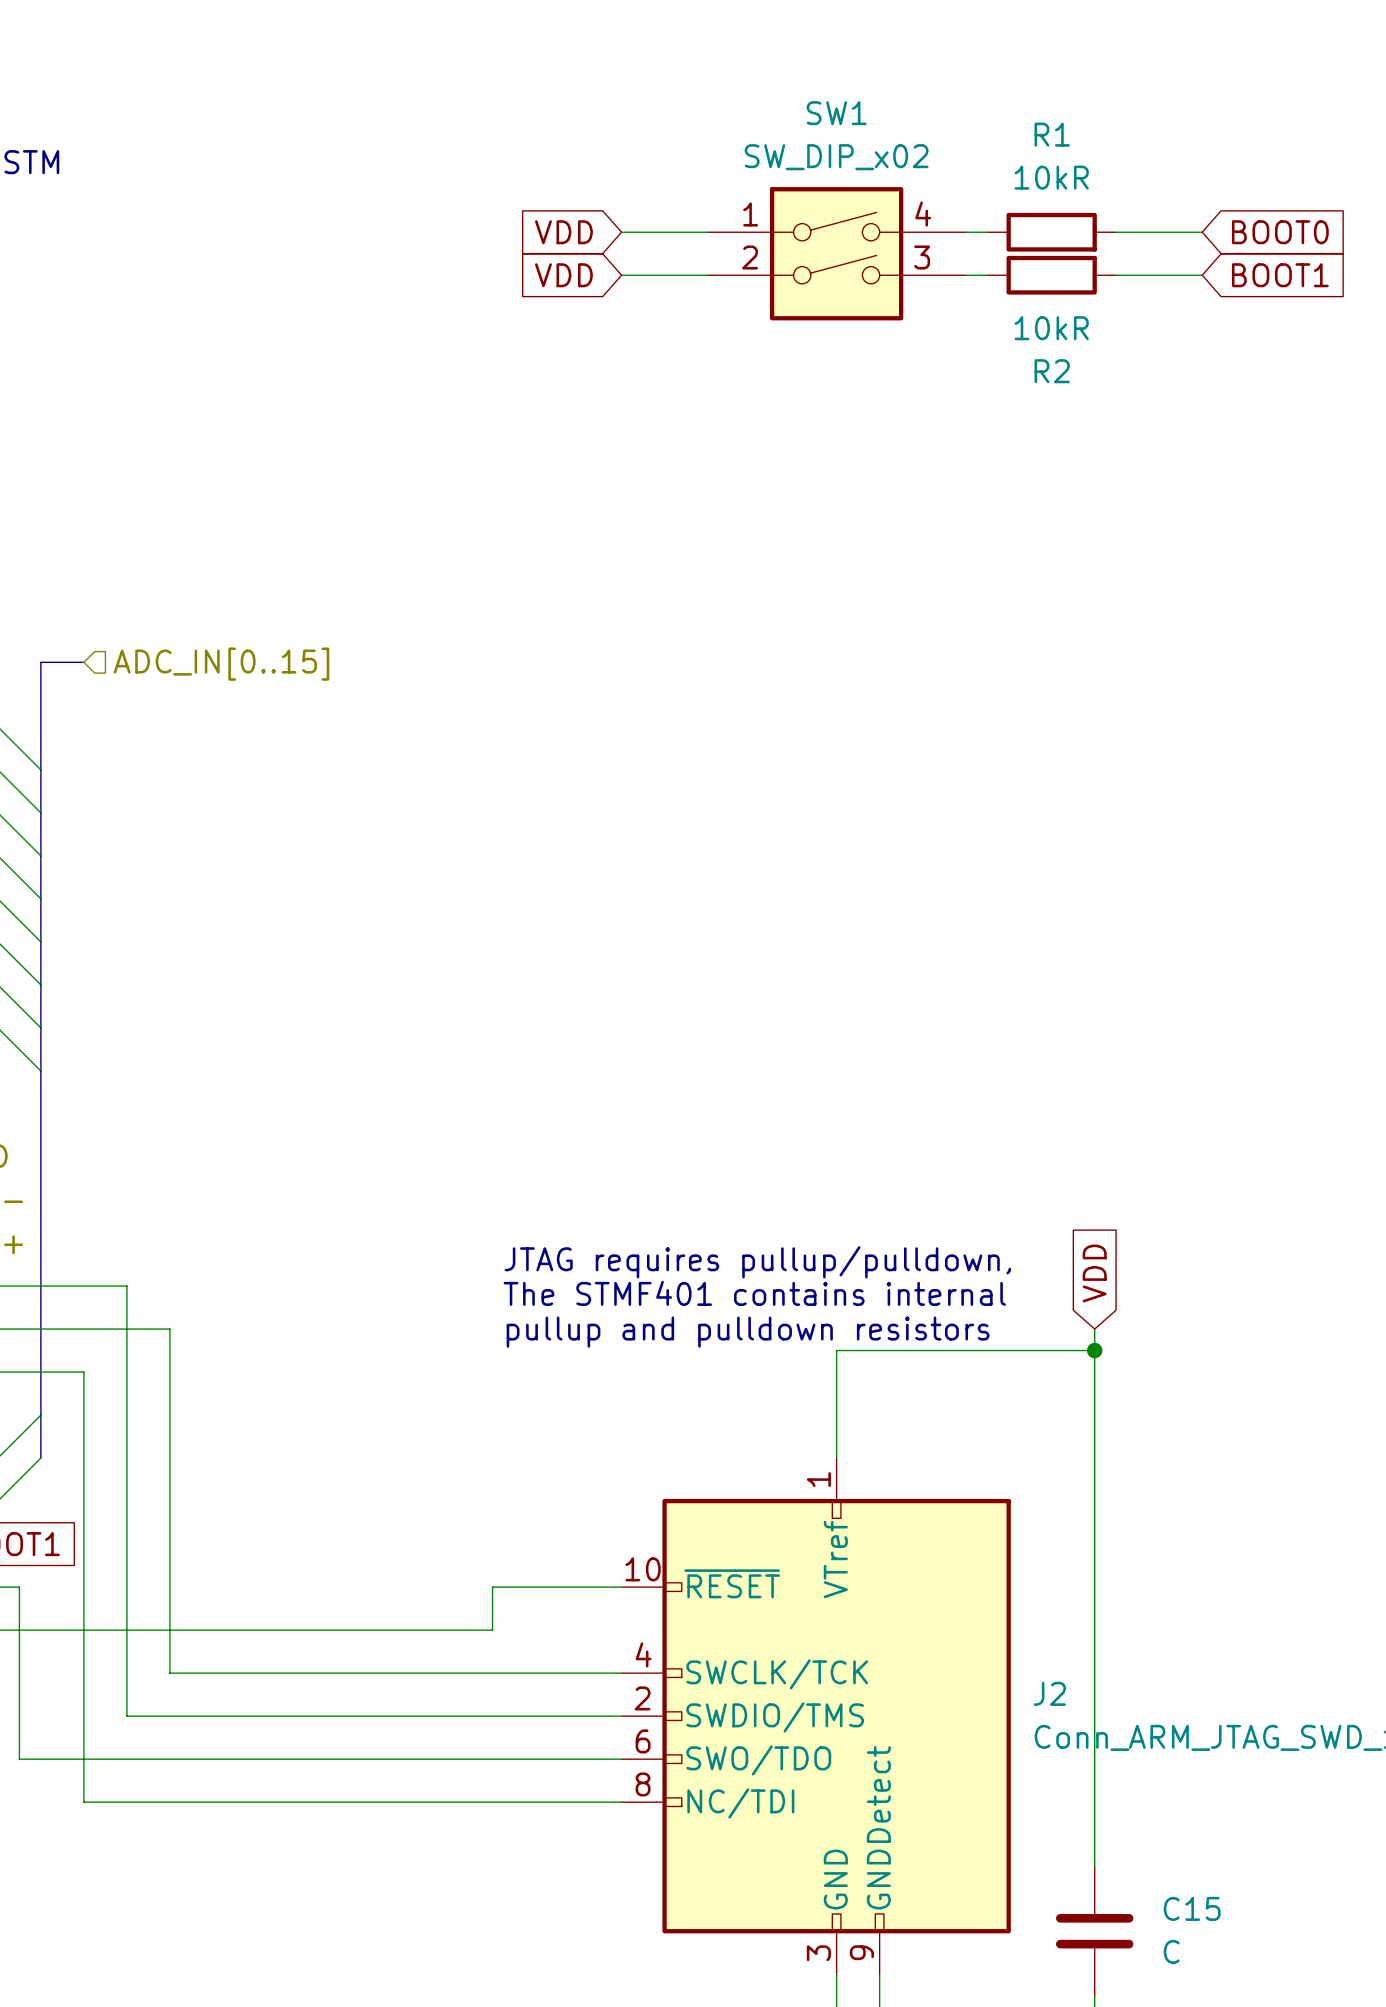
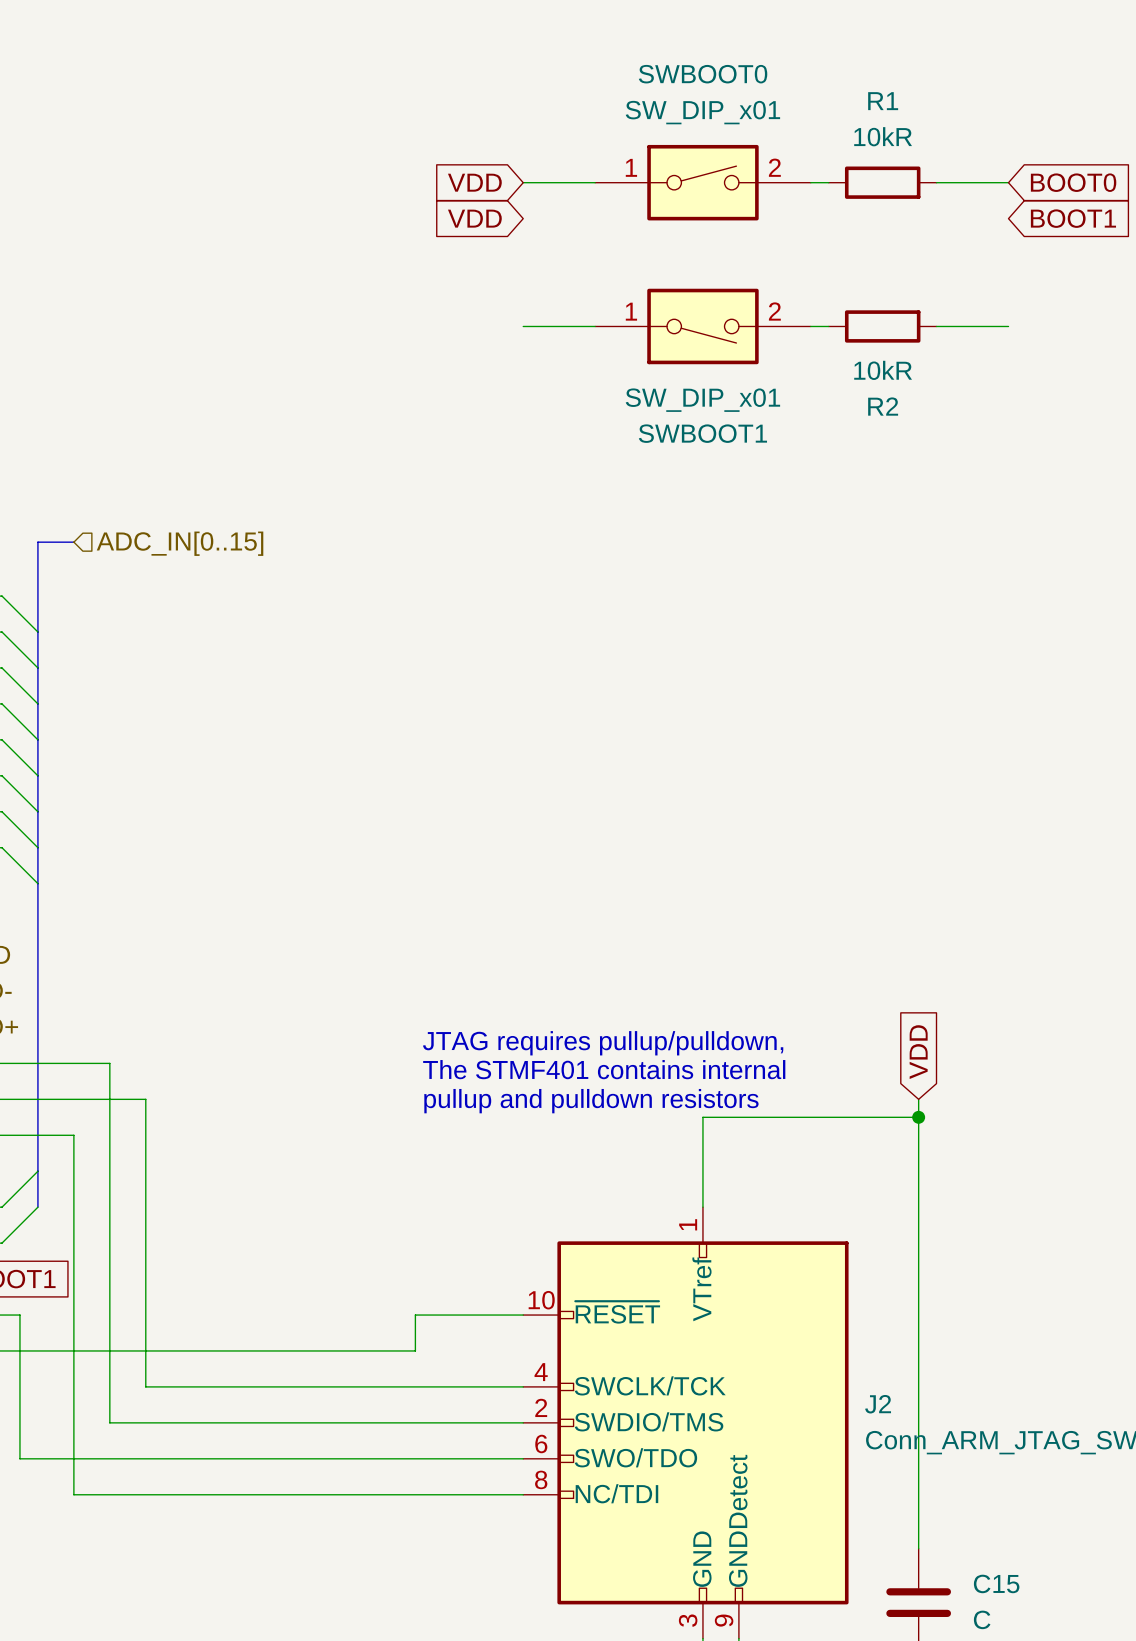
SWBOOT0: none -> SW_DIP_x01 (702, 182)
SW1: SW_DIP_x02 (836, 253) -> none
wire: (621, 275) (707, 275) -> (523, 326) (595, 326)
wire: (965, 275) (987, 275) -> (810, 326) (828, 326)
R2 position: (1051, 275) -> (882, 326)
wire: (1116, 275) (1202, 275) -> (936, 326) (1008, 326)
SWBOOT1: none -> SW_DIP_x01 (702, 326)

